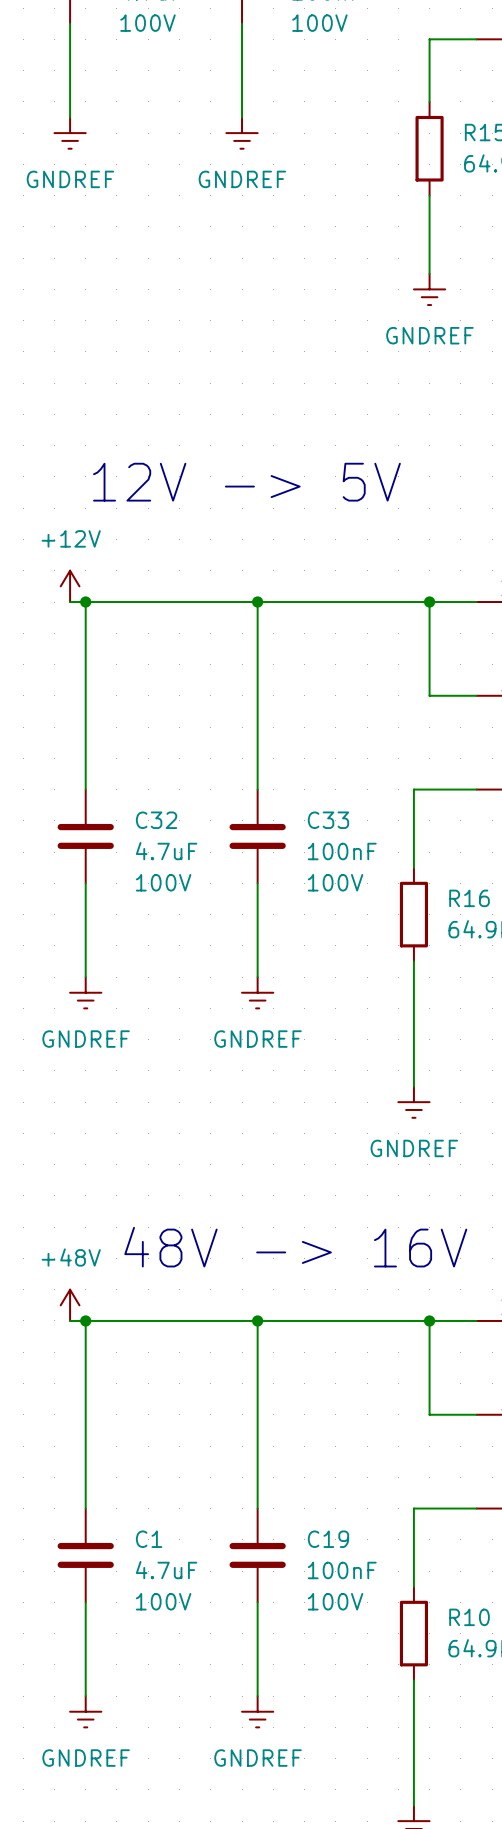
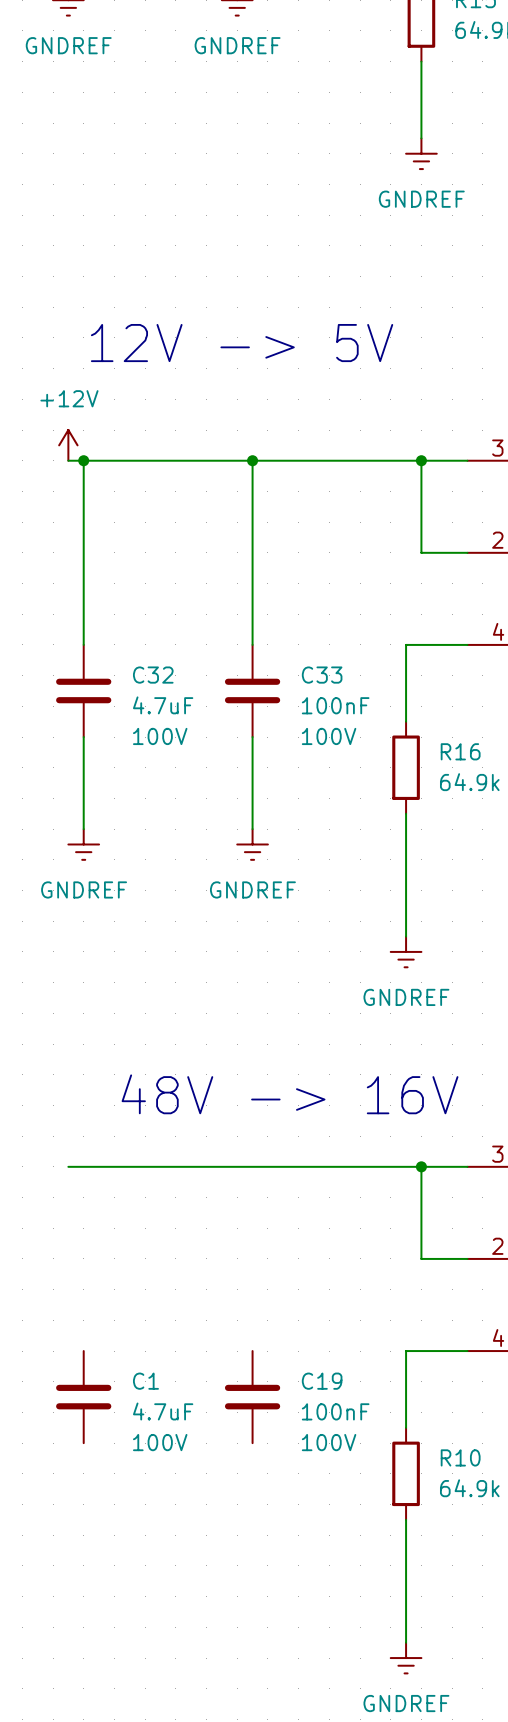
power symbol: +48V (70, 1305) -> none
wire: (85, 1320) (85, 1508) -> none
junction: (85, 1320) -> none
wire: (257, 1320) (257, 1508) -> none
junction: (257, 1320) -> none
wire: (85, 1602) (85, 1696) -> none
wire: (257, 1602) (257, 1696) -> none
power symbol: GNDREF (85, 1711) -> none
power symbol: GNDREF (257, 1711) -> none

